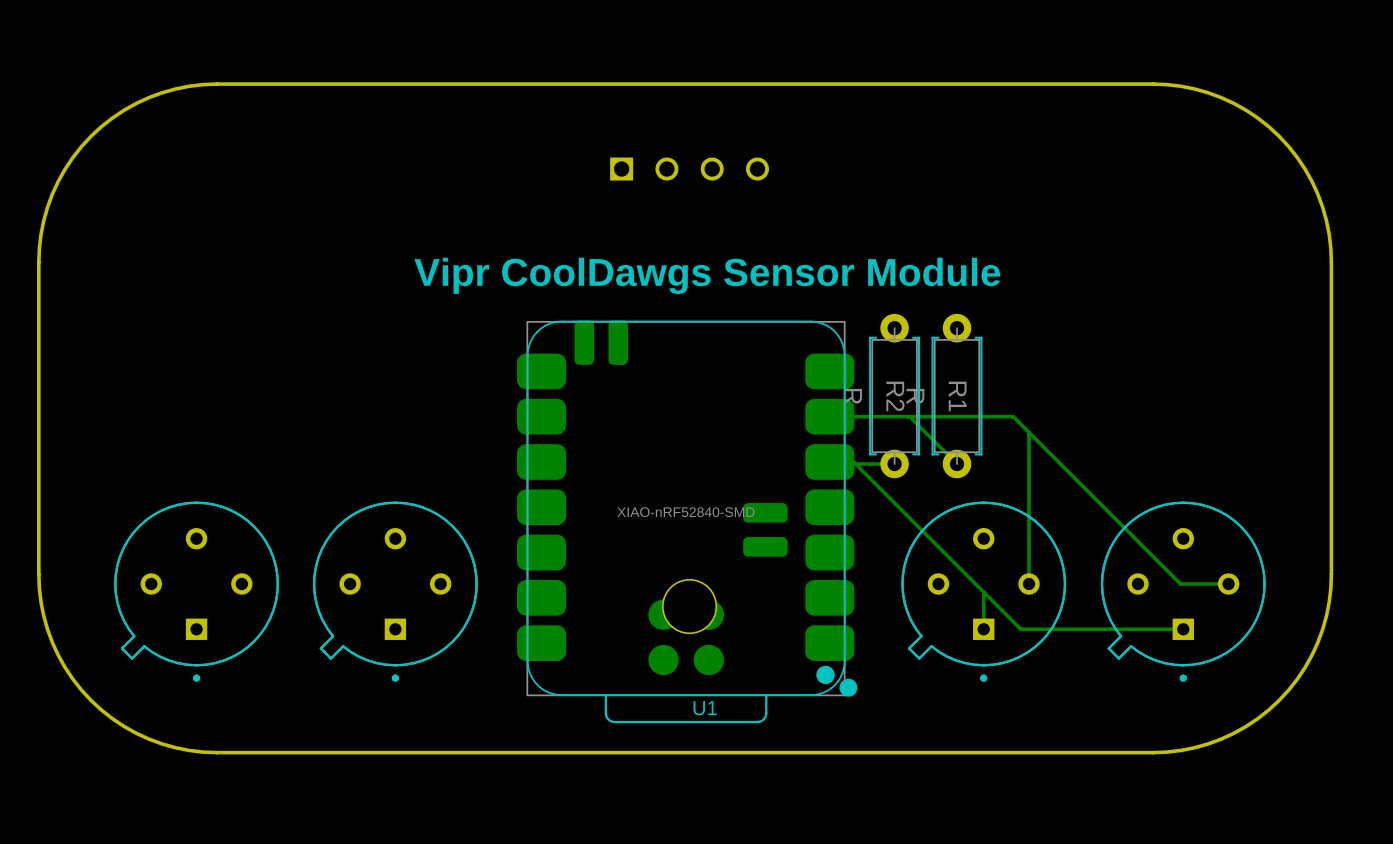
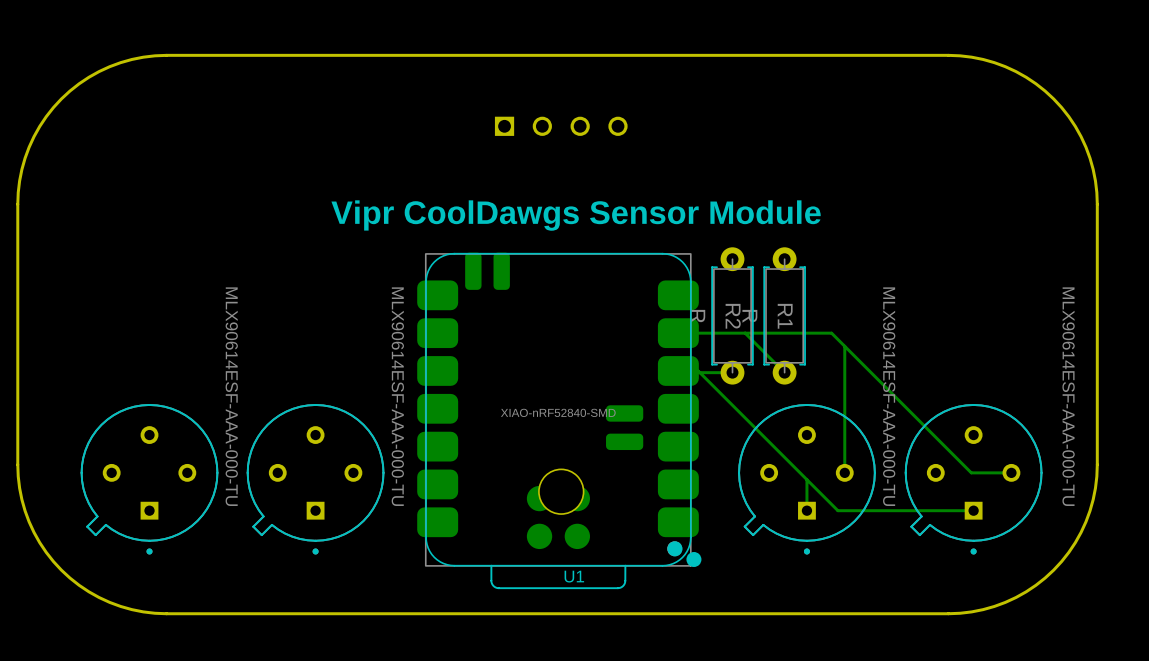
part value: none -> MLX90614ESF-AAA-000-TU (231, 396)
part value: none -> MLX90614ESF-AAA-000-TU (397, 396)
part value: none -> MLX90614ESF-AAA-000-TU (889, 396)
part value: none -> MLX90614ESF-AAA-000-TU (1068, 396)

